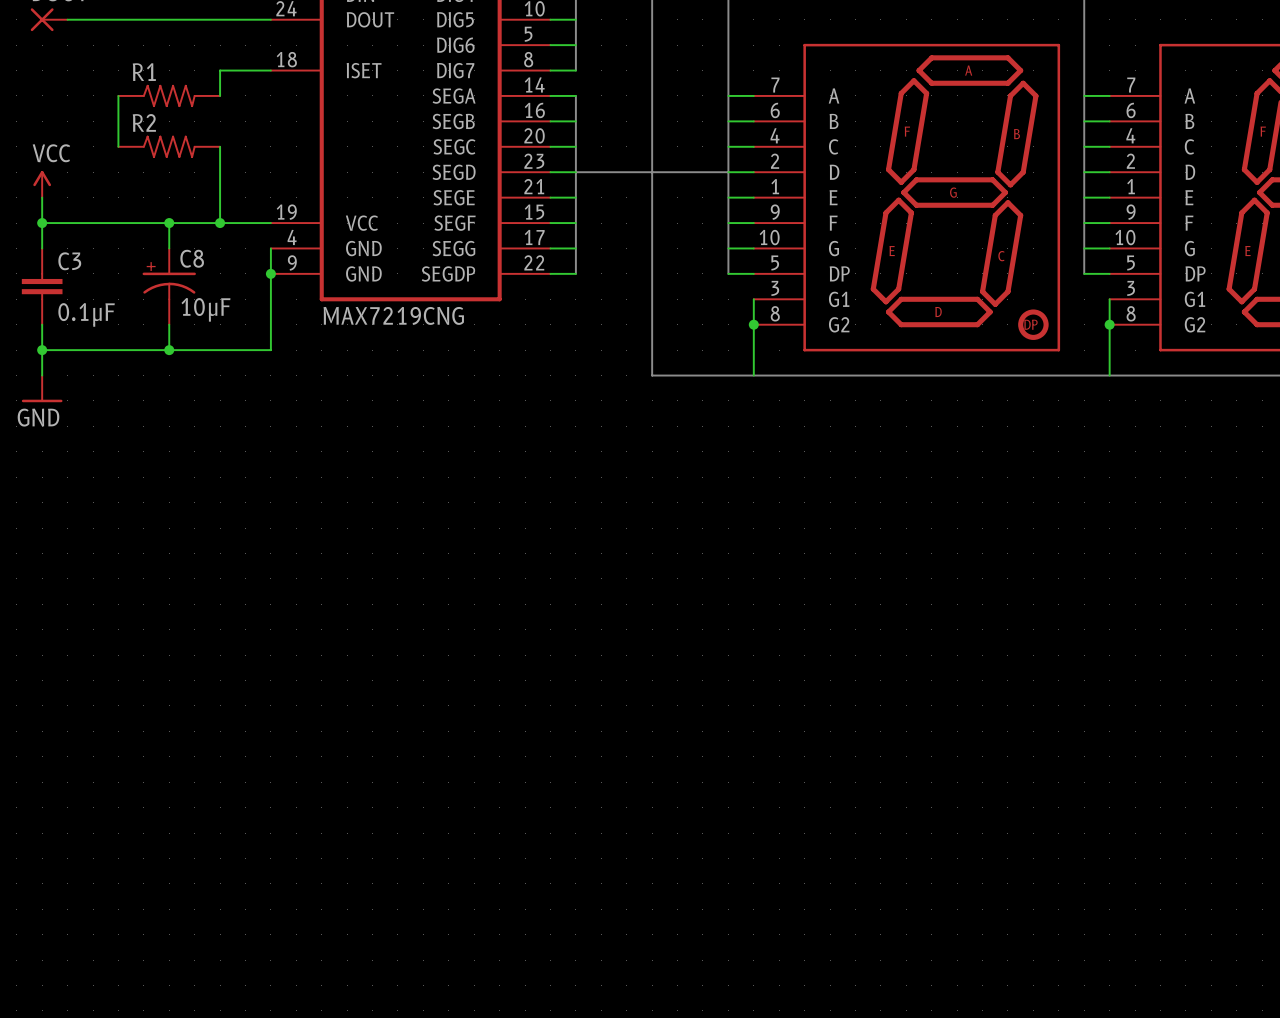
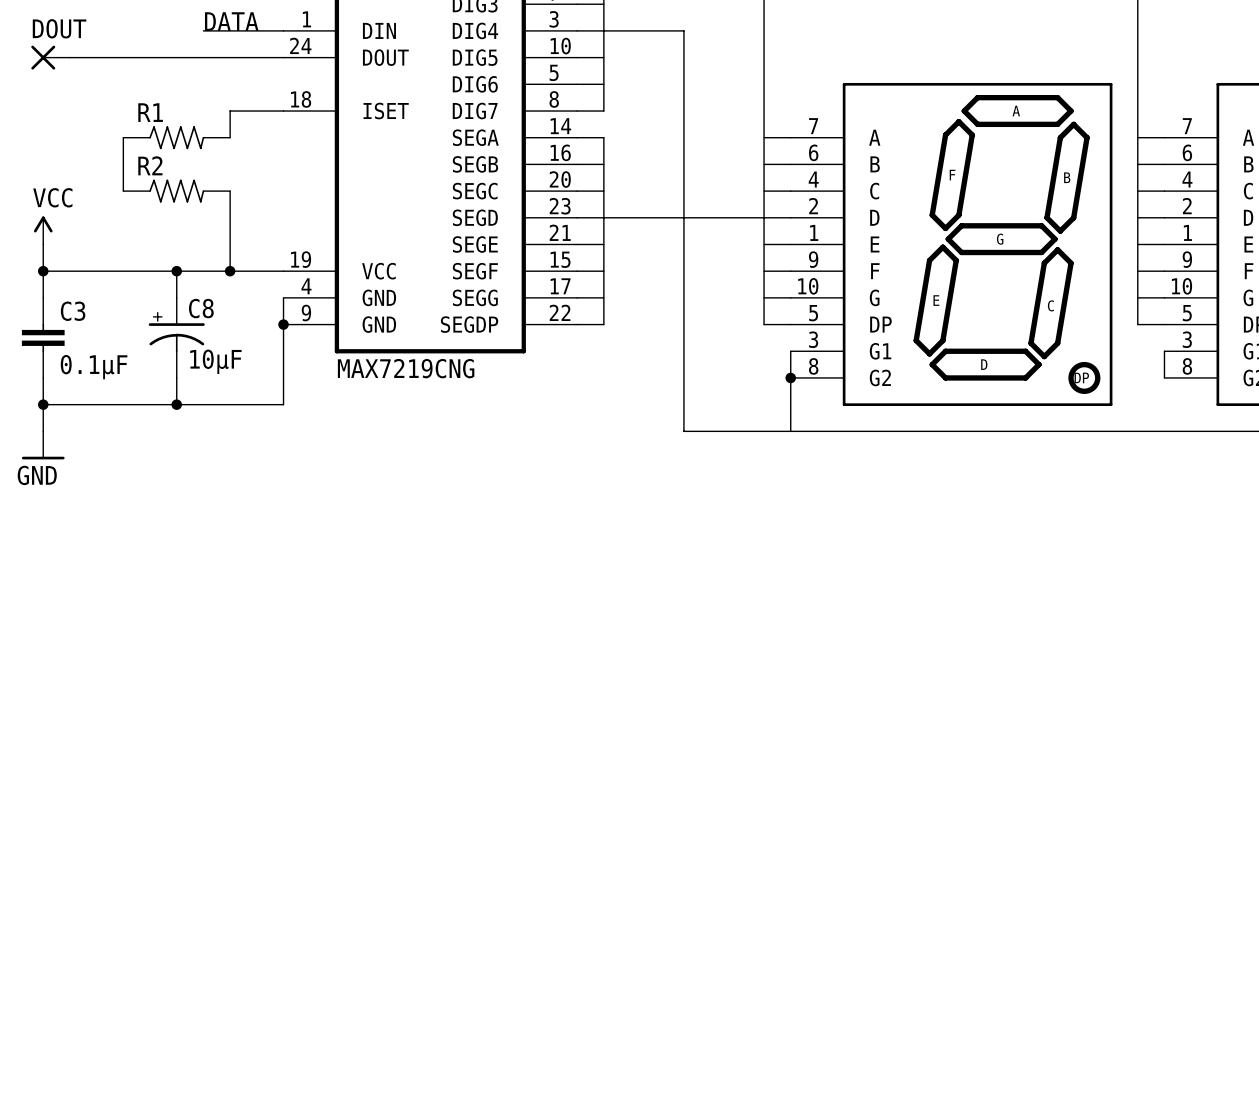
wire: (1109, 324) (1109, 375) -> none
junction: (1109, 324) -> none

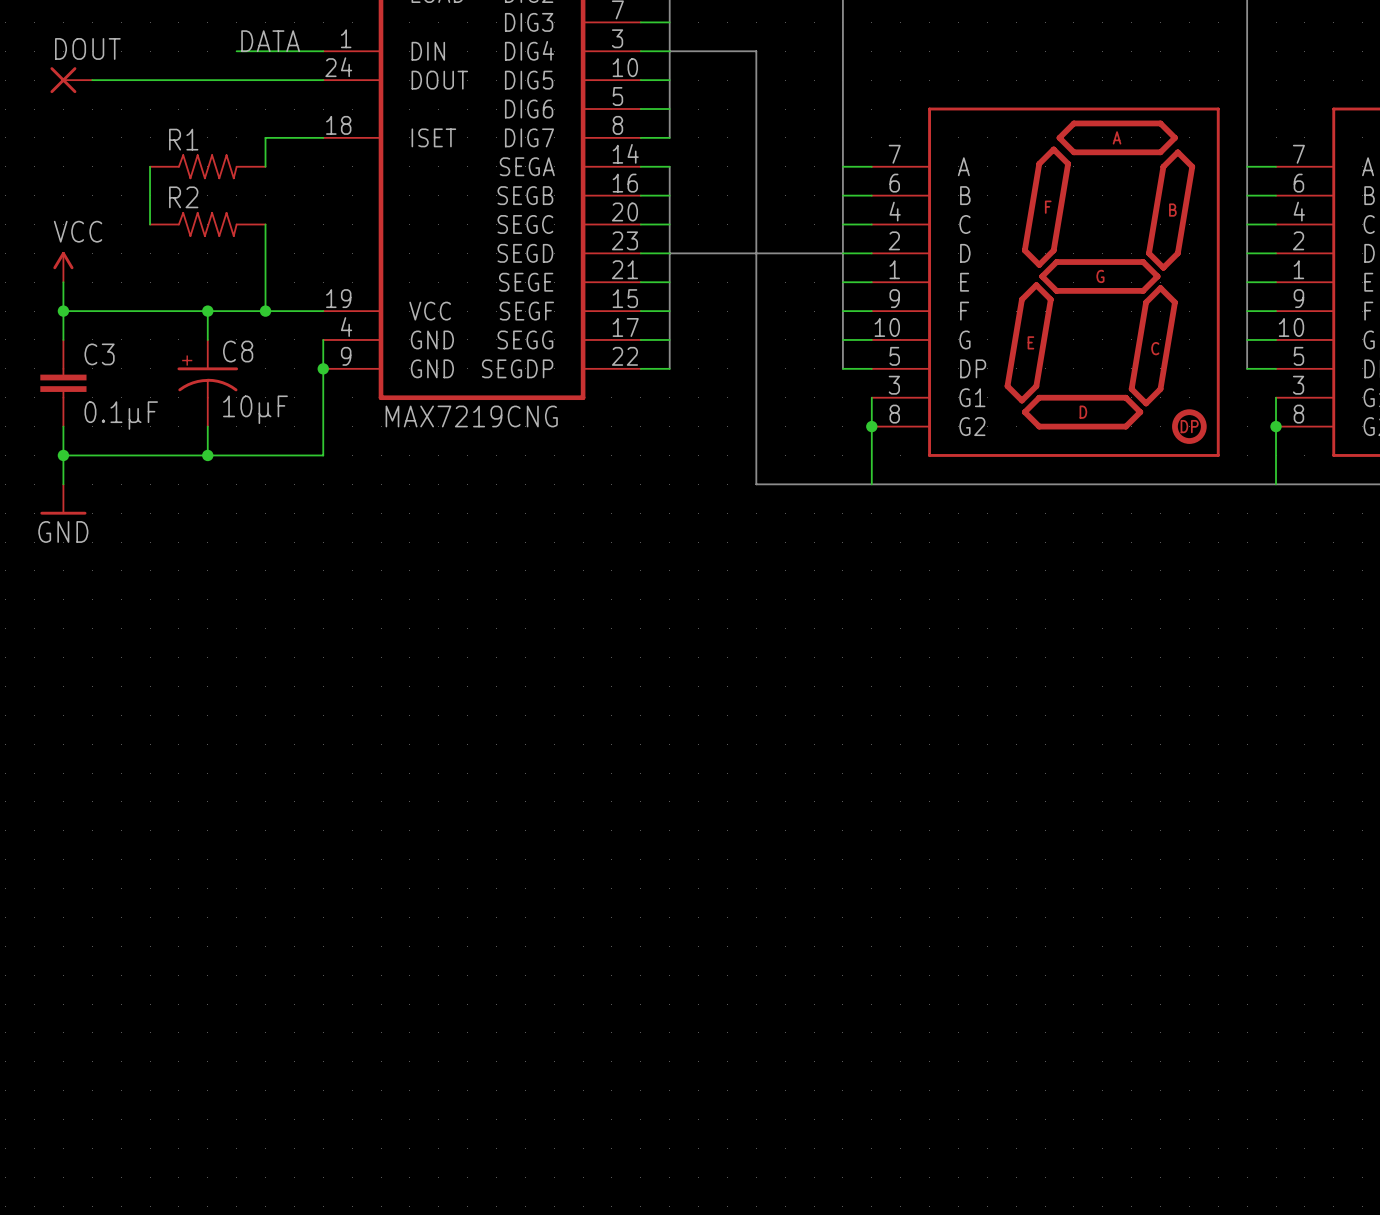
wire: none -> (1276, 426) (1276, 484)
junction: none -> (1276, 426)

